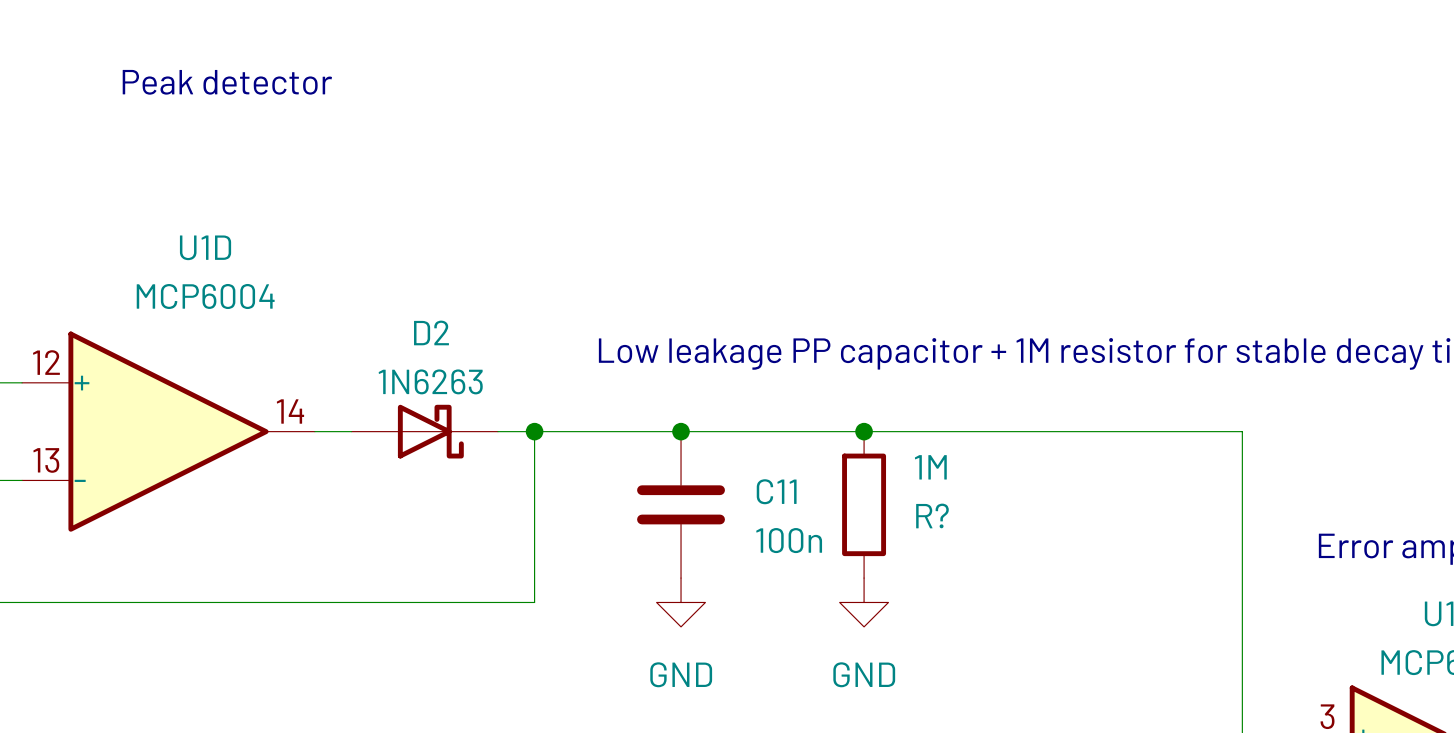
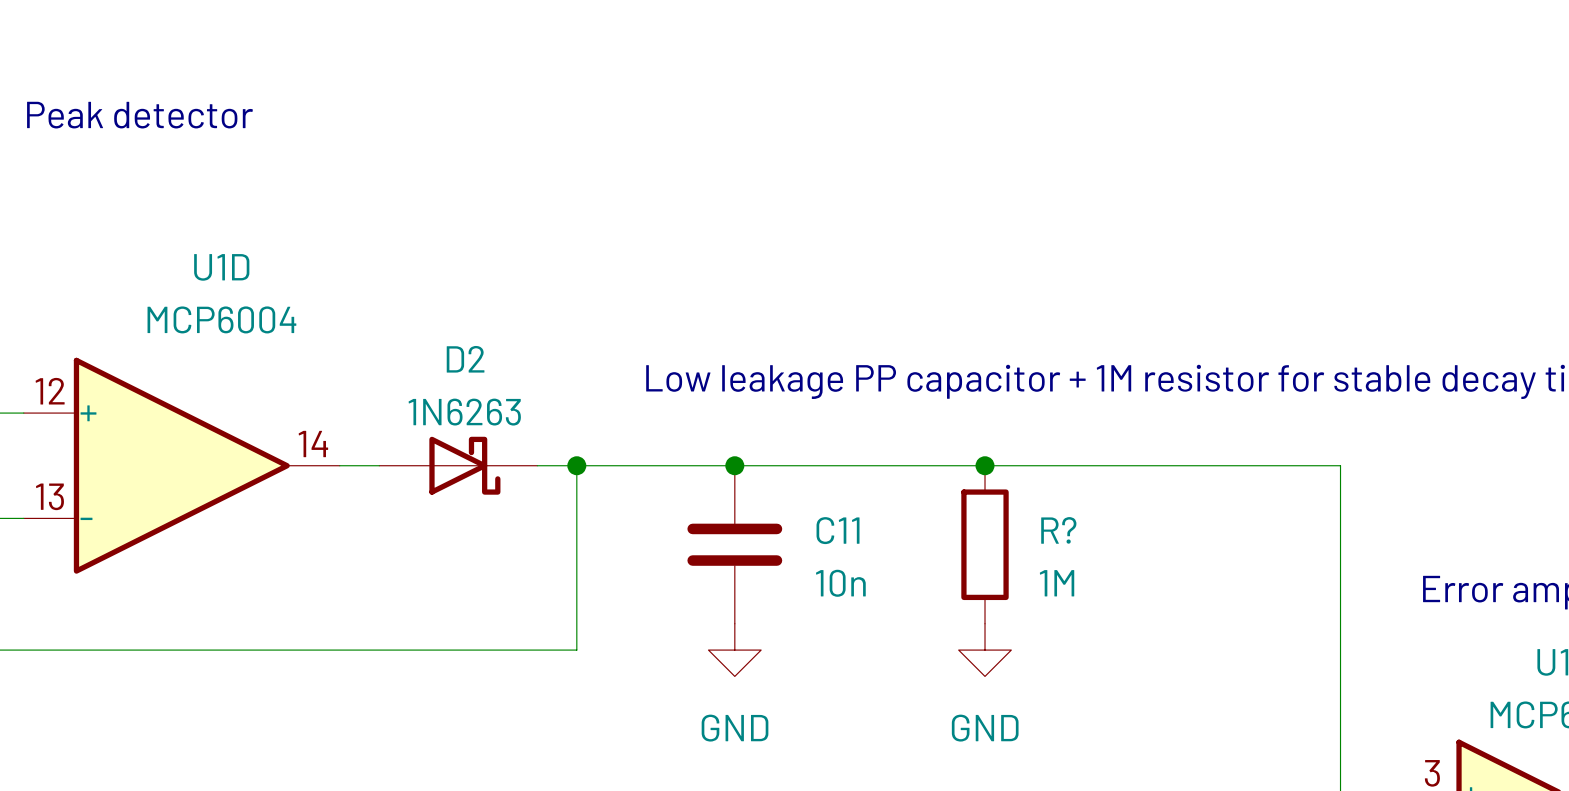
text position: Peak detector (227, 82) -> Peak detector (140, 115)
junction position: (864, 431) -> (985, 465)
R? value position: 1M (930, 467) -> 1M (1057, 583)
R? position: (864, 504) -> (985, 544)
R? name position: R? (932, 515) -> R? (1058, 530)
C11 value: 100n (789, 540) -> 10n (840, 583)
power symbol position: GND (864, 602) -> GND (985, 650)

